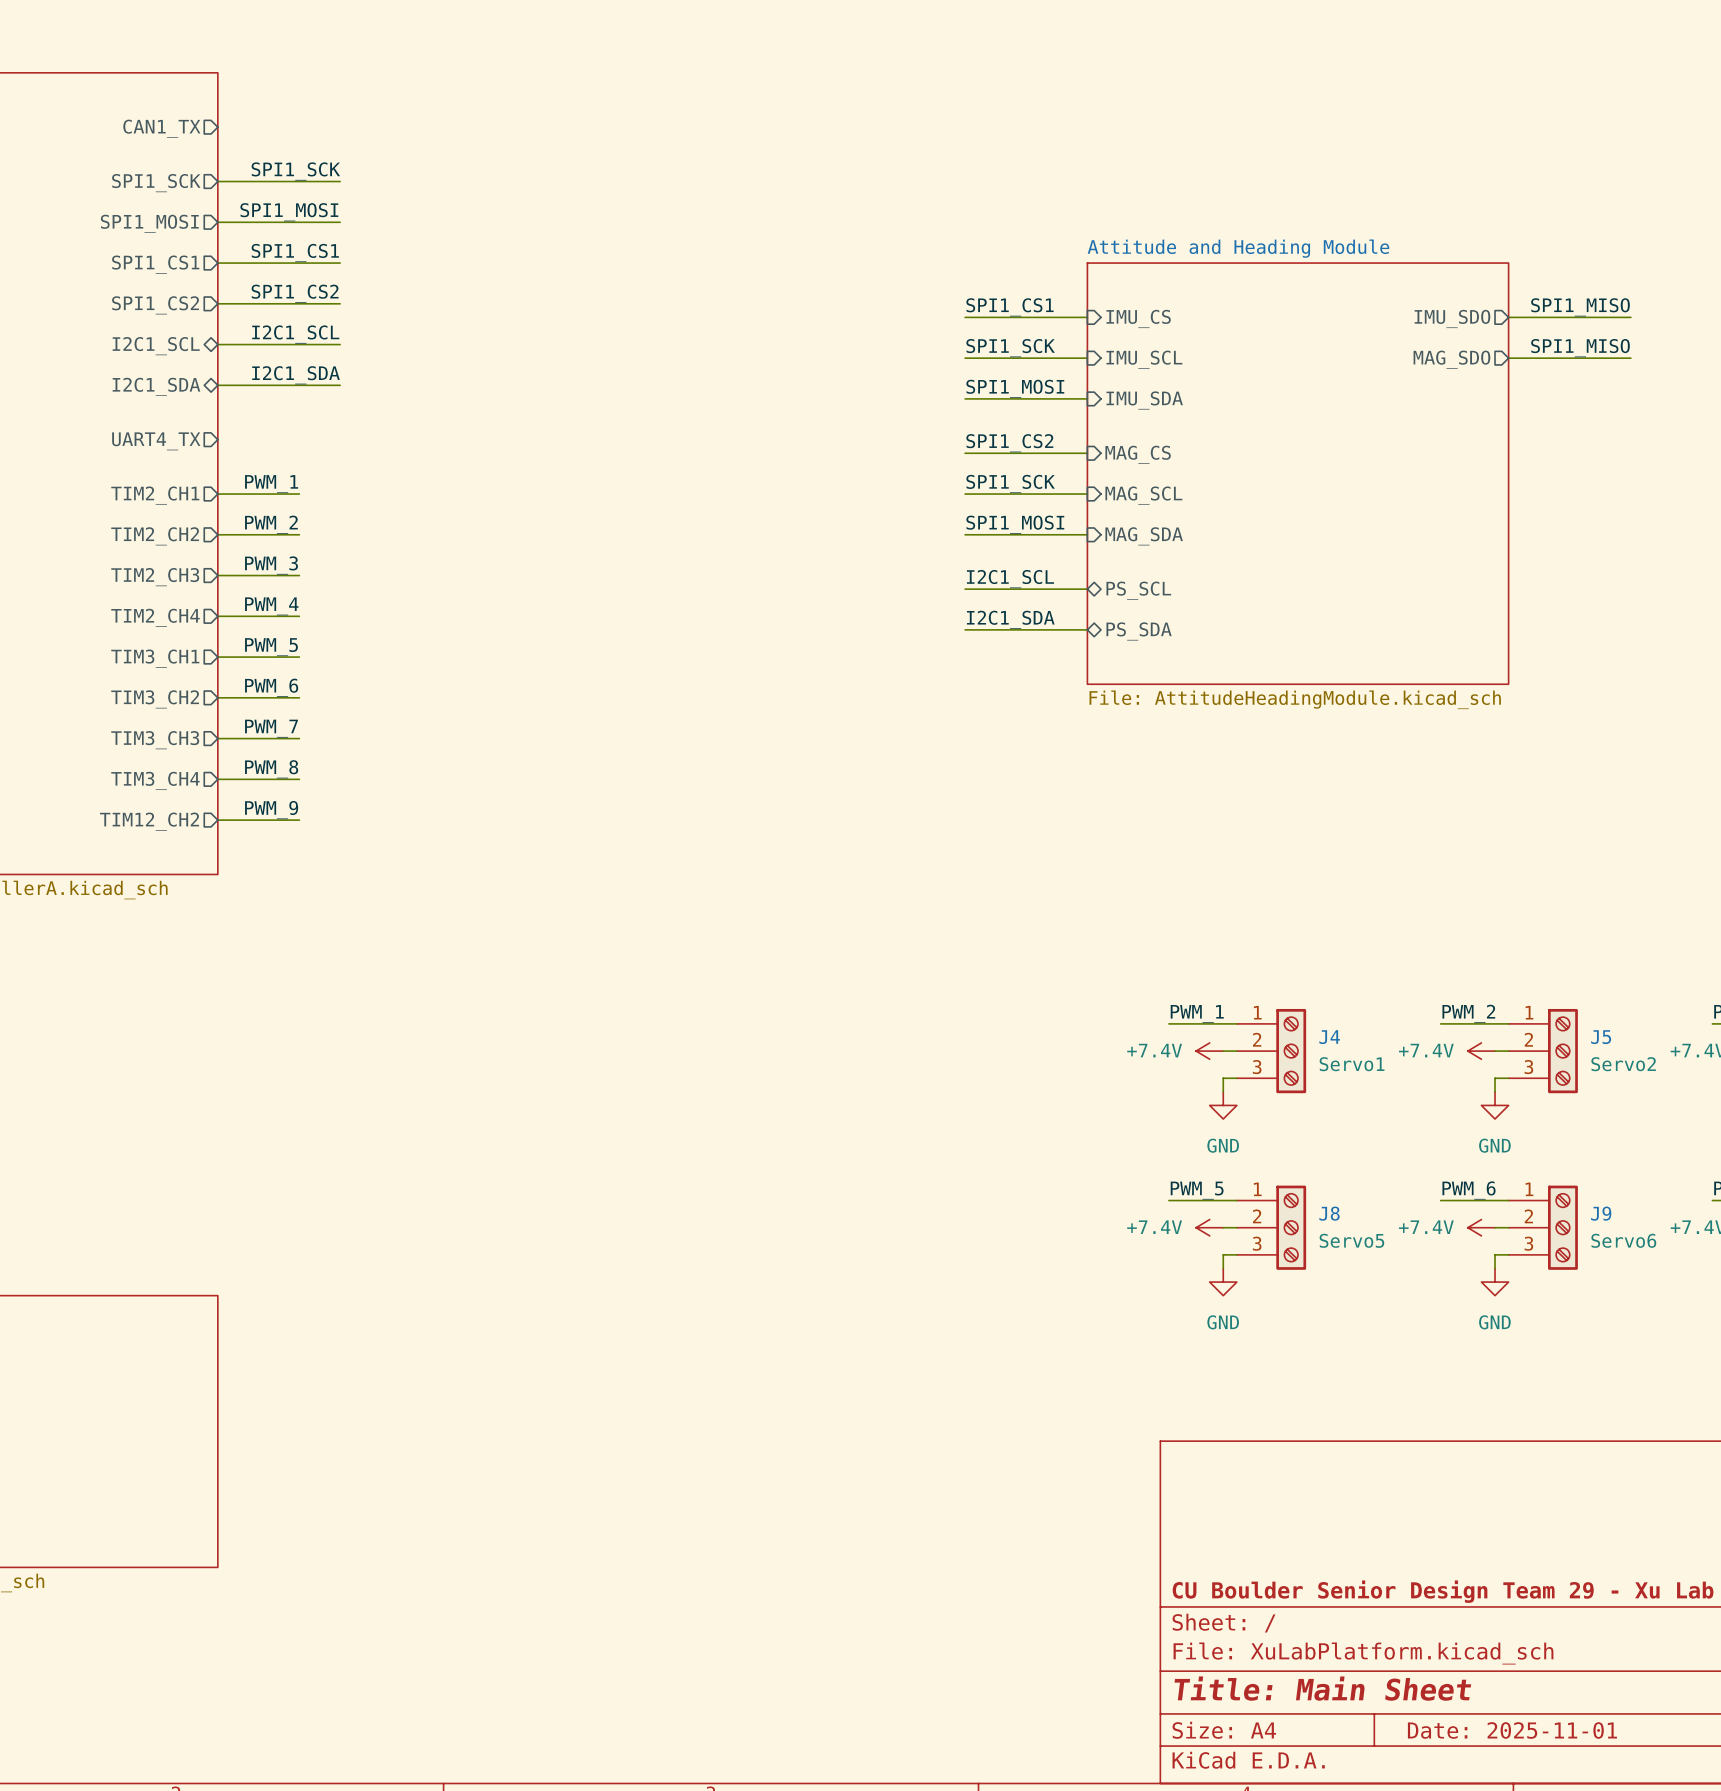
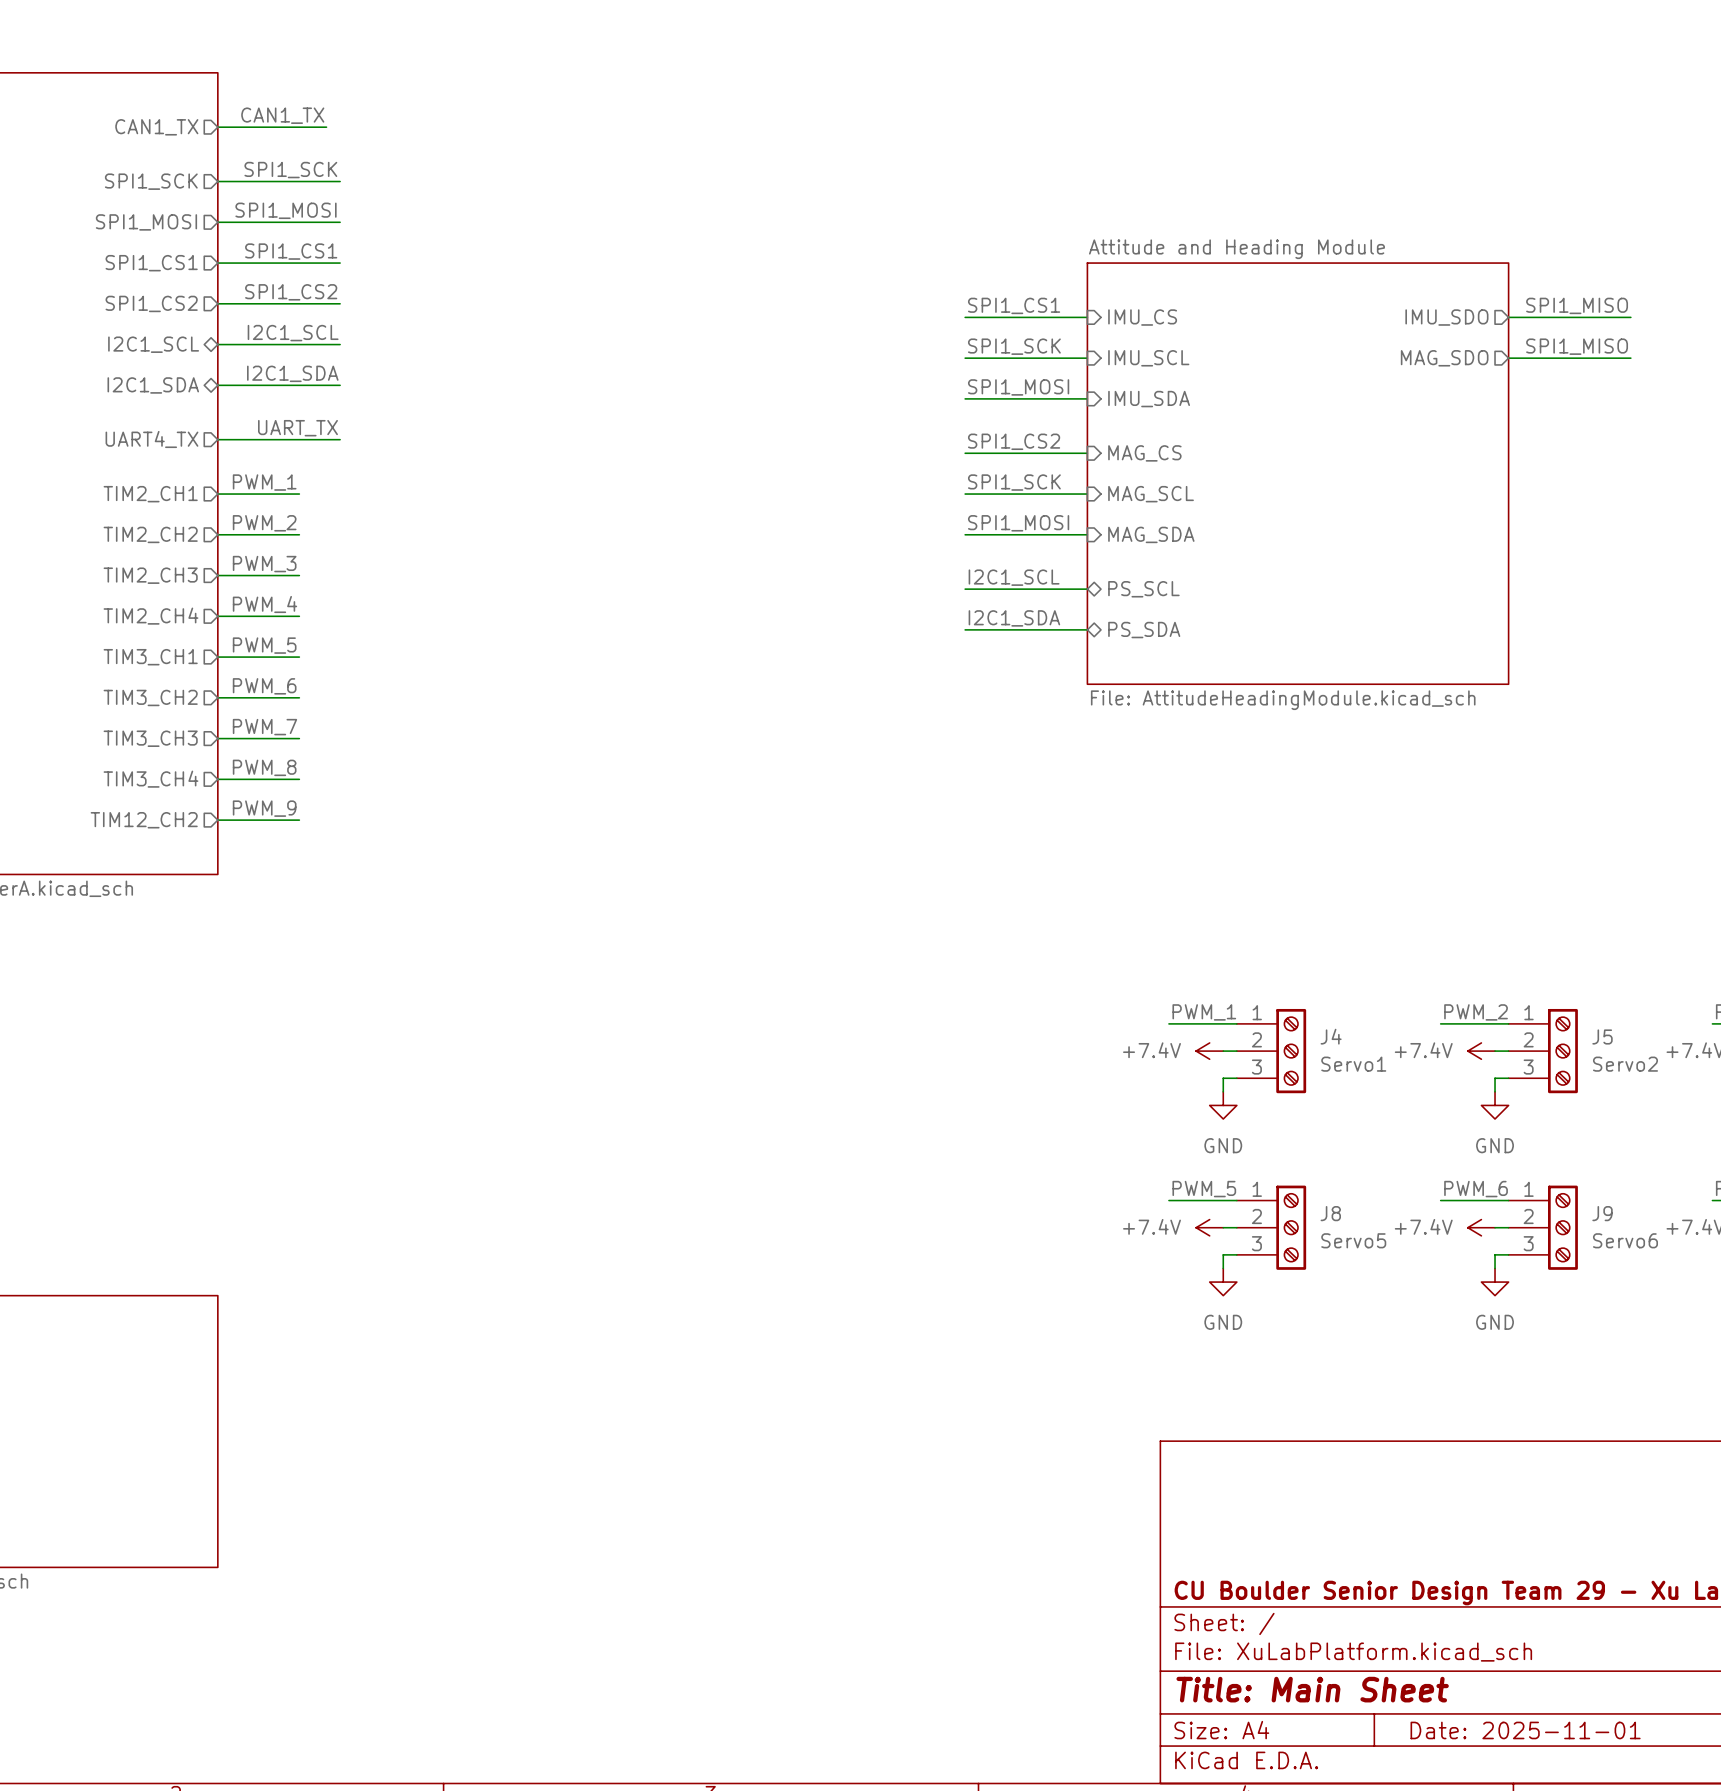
label: none -> CAN1_TX (282, 115)
wire: none -> (217, 127) (326, 127)
label: none -> UART_TX (297, 428)
wire: none -> (217, 439) (340, 439)

